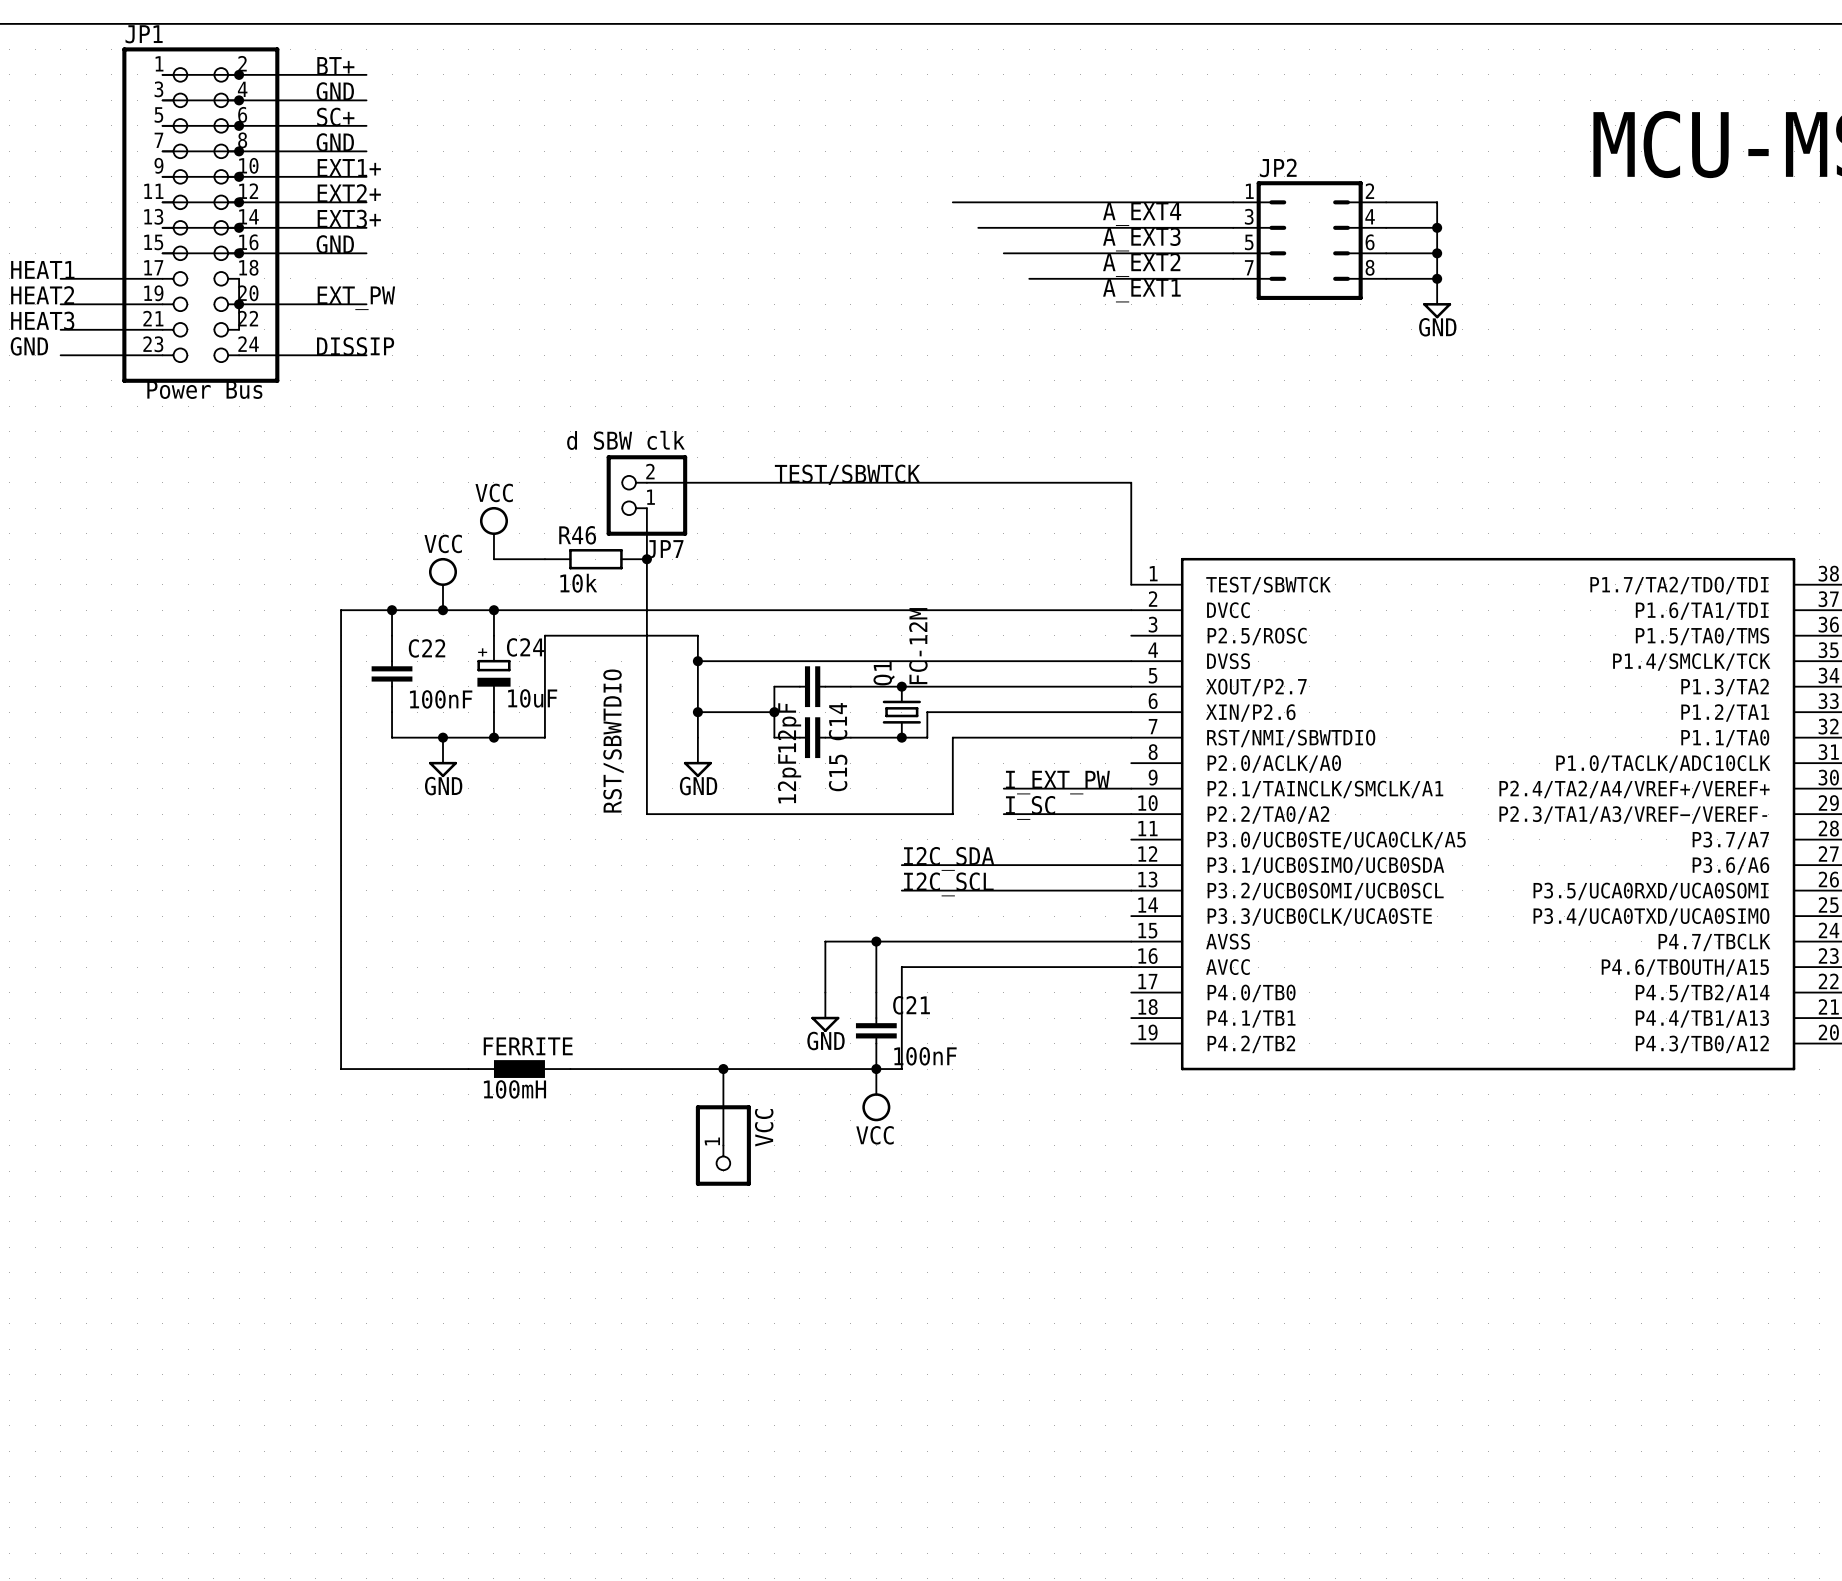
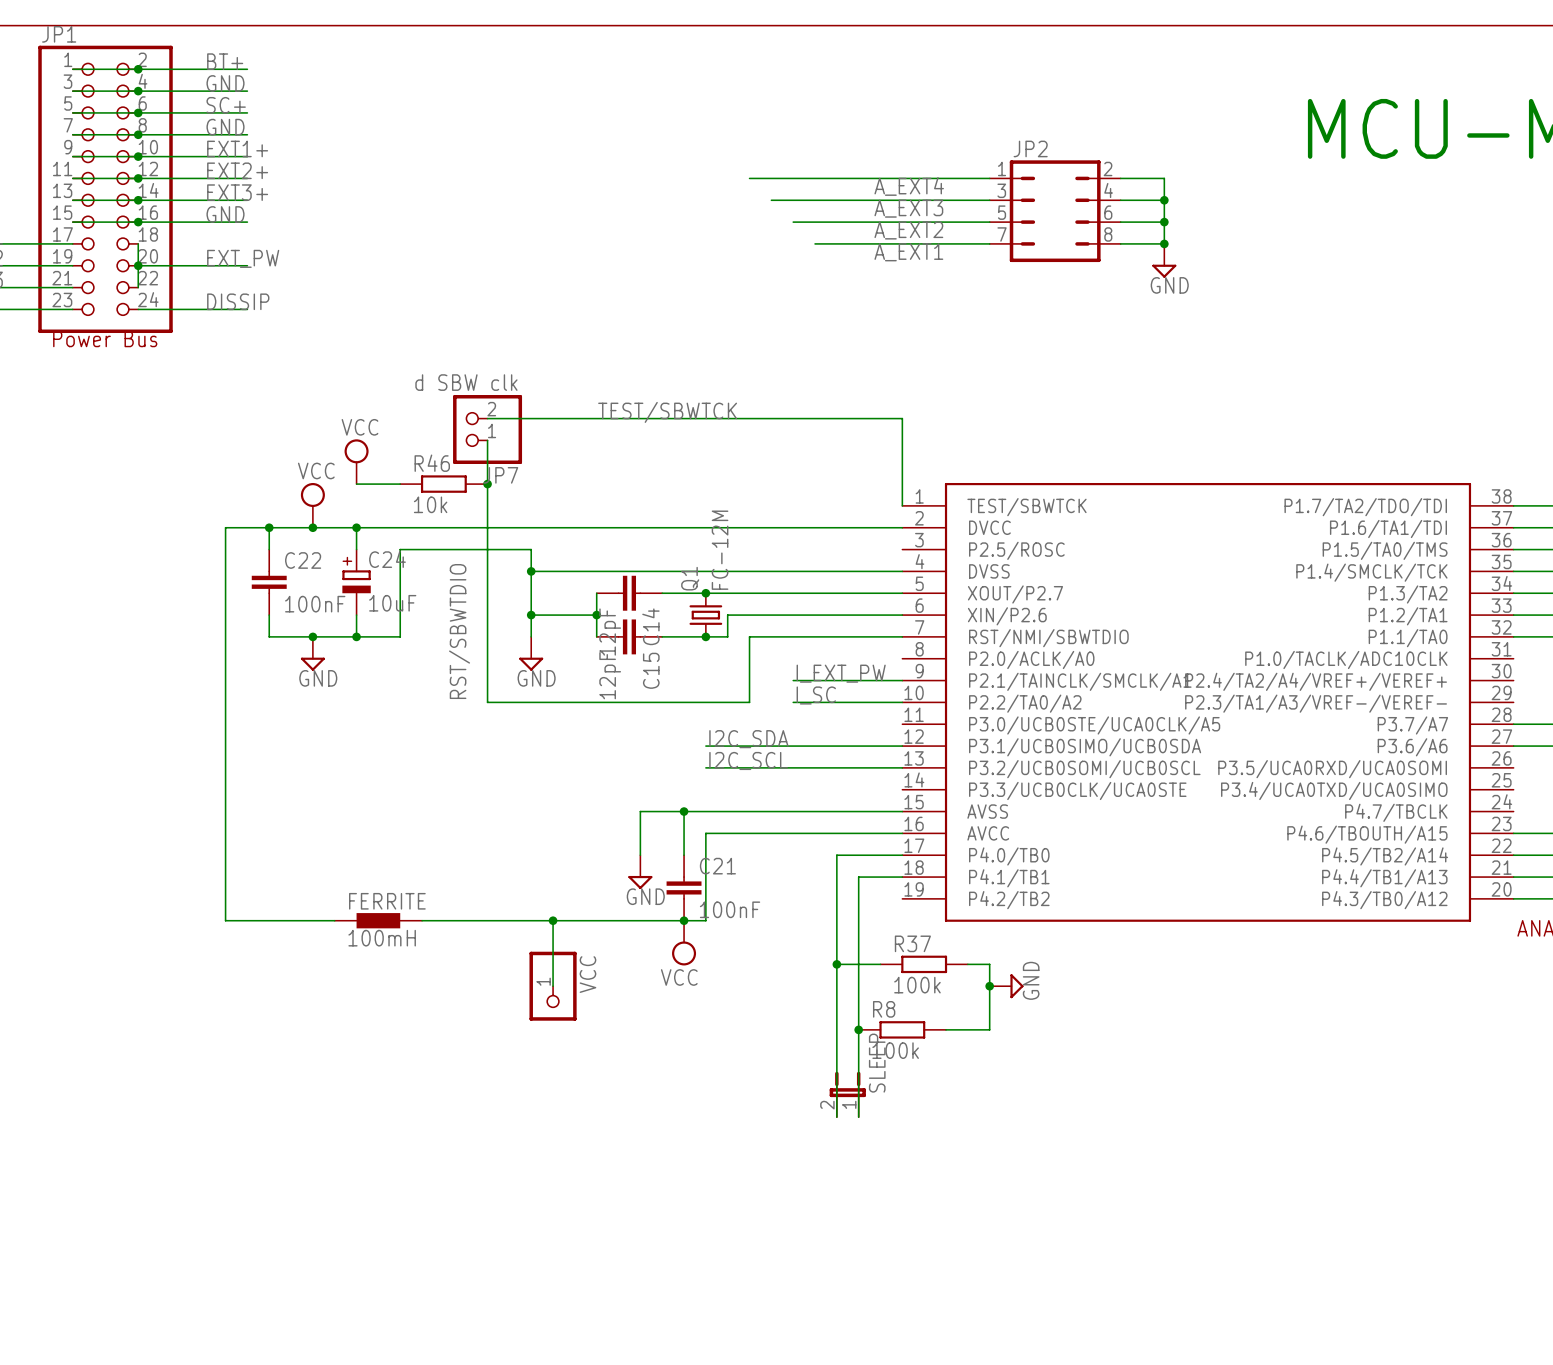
wire: none -> (902, 855) (836, 855) (836, 1117)
wire: none -> (902, 877) (858, 877) (858, 1117)
wire: none -> (836, 964) (880, 964)
junction: none -> (836, 964)
R37: none -> 100k (924, 964)
wire: none -> (967, 964) (989, 964) (989, 1029) (946, 1029)
junction: none -> (989, 986)
power symbol: none -> GND (1006, 986)
junction: none -> (858, 1029)
R8: none -> 100k (902, 1029)
SLEEP: none -> (847, 1094)

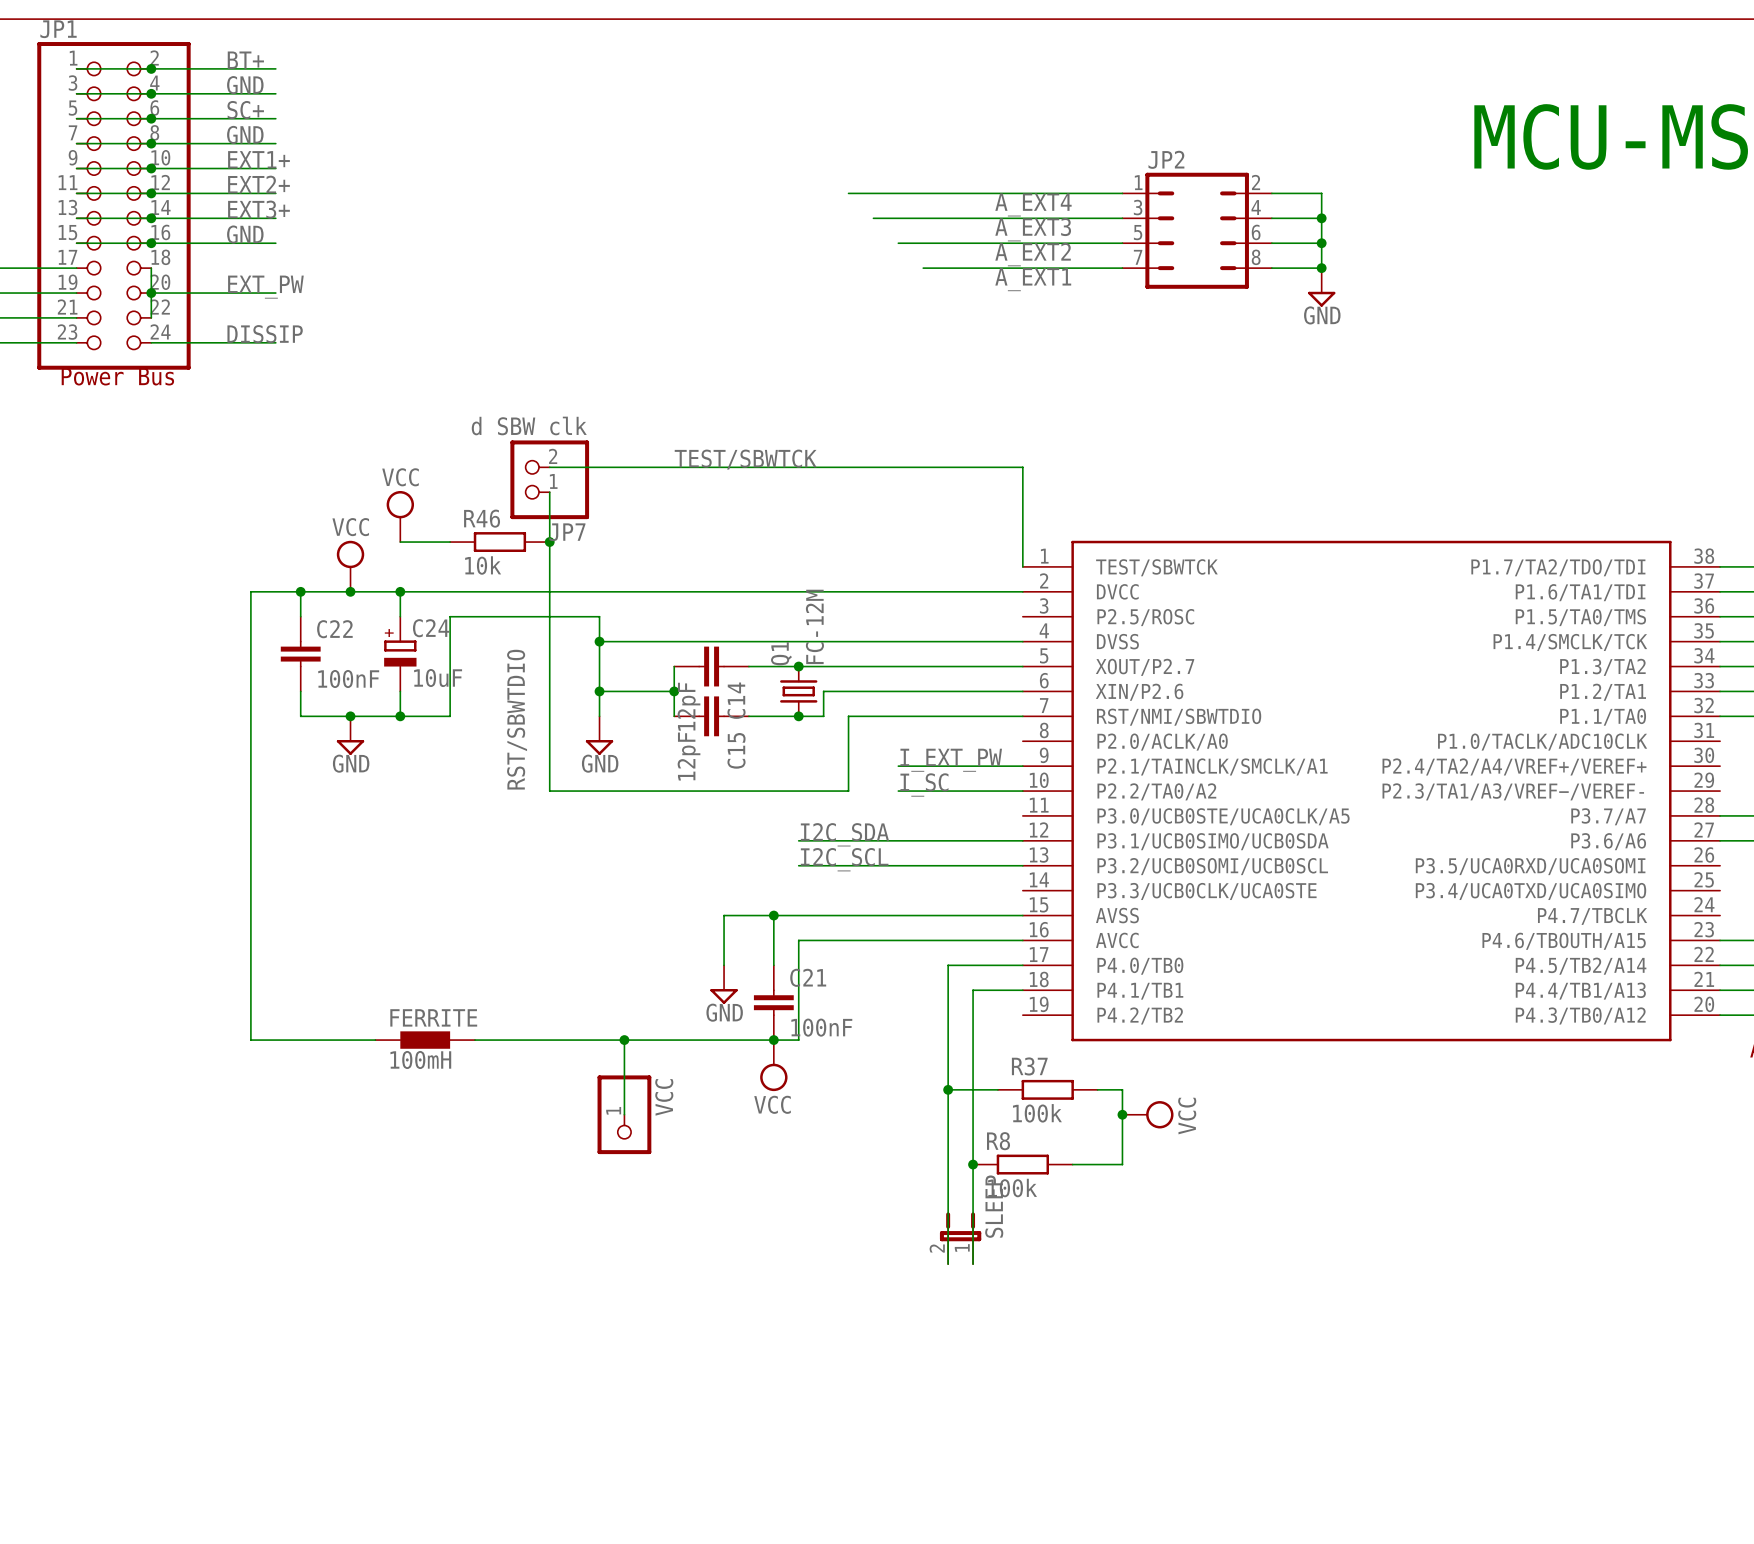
power symbol: GND (1006, 986) -> VCC (1147, 1114)

